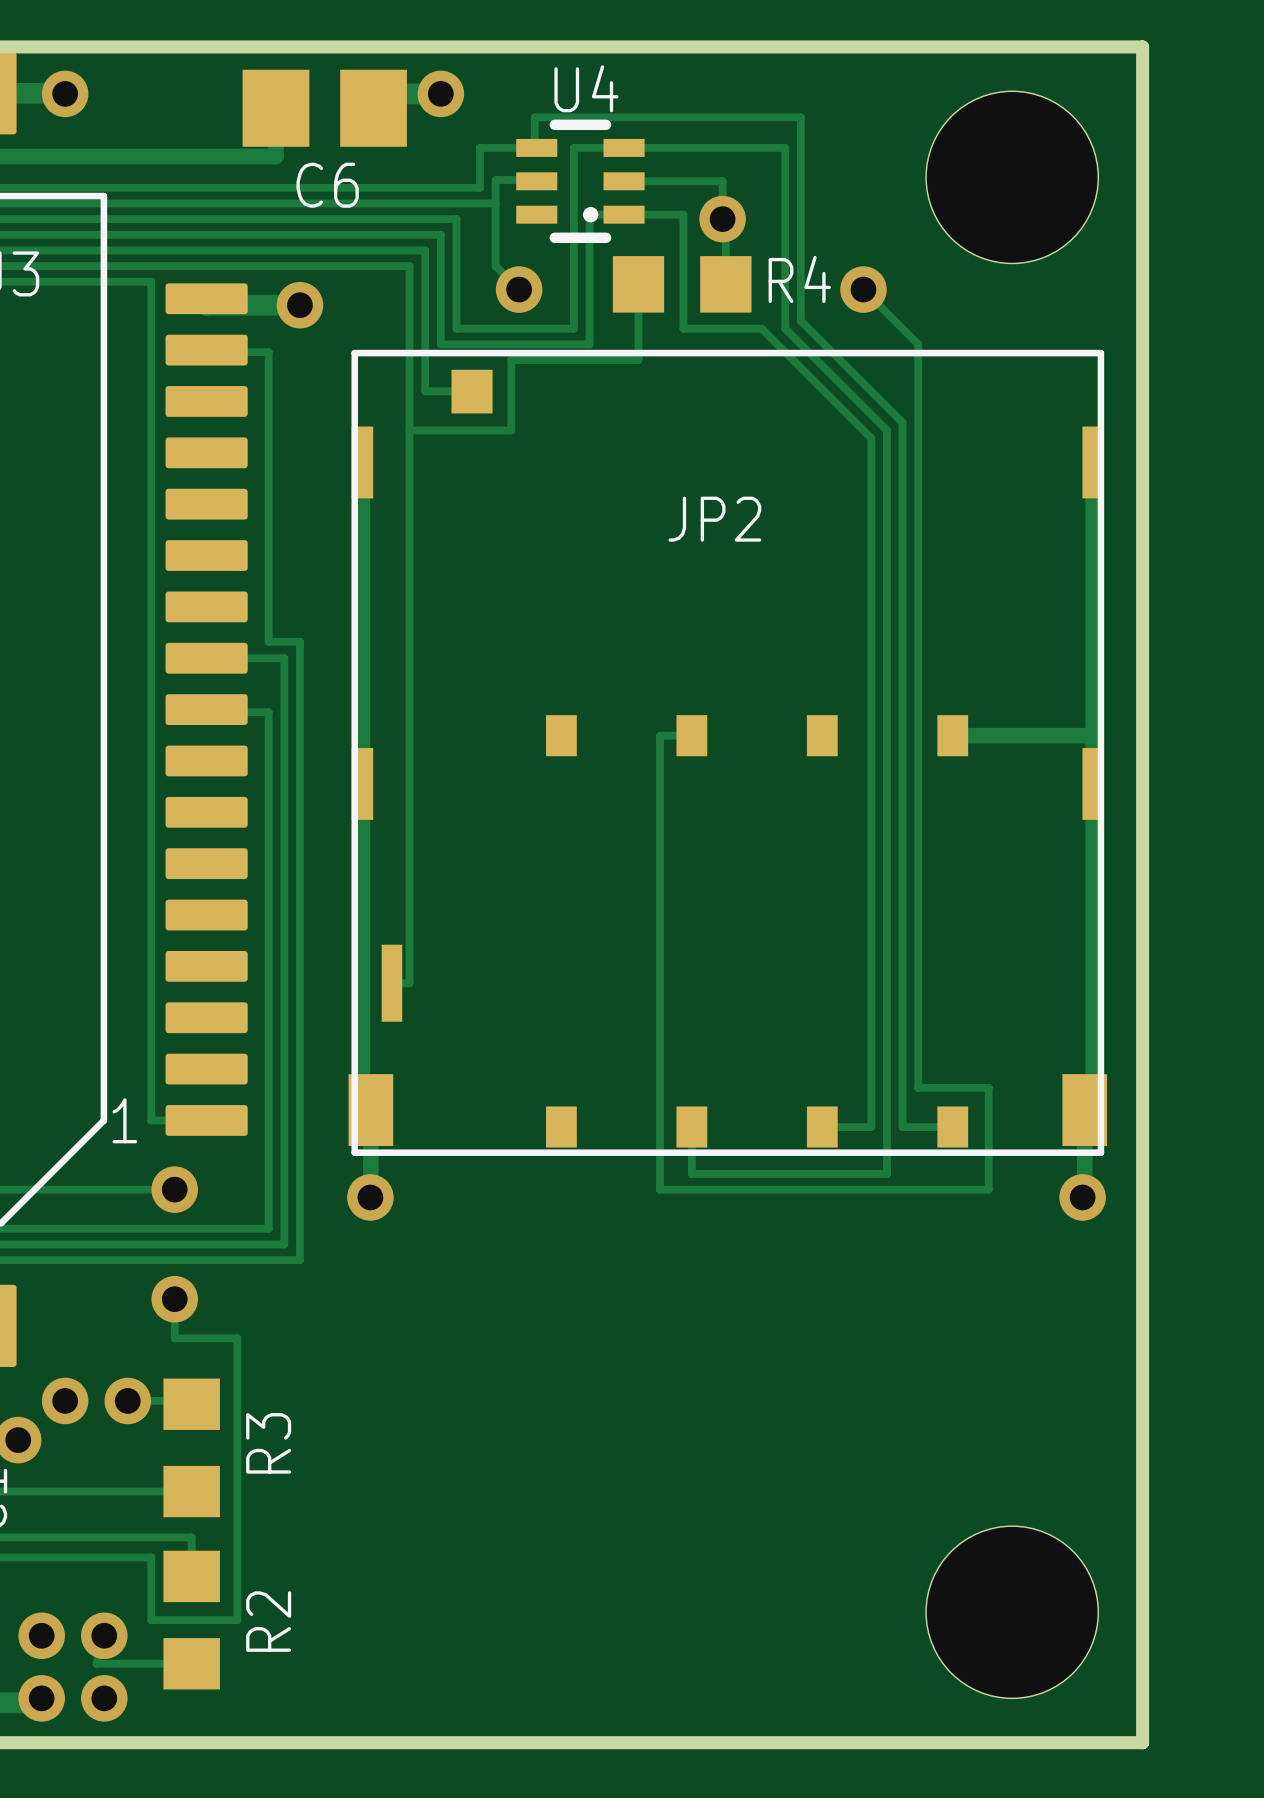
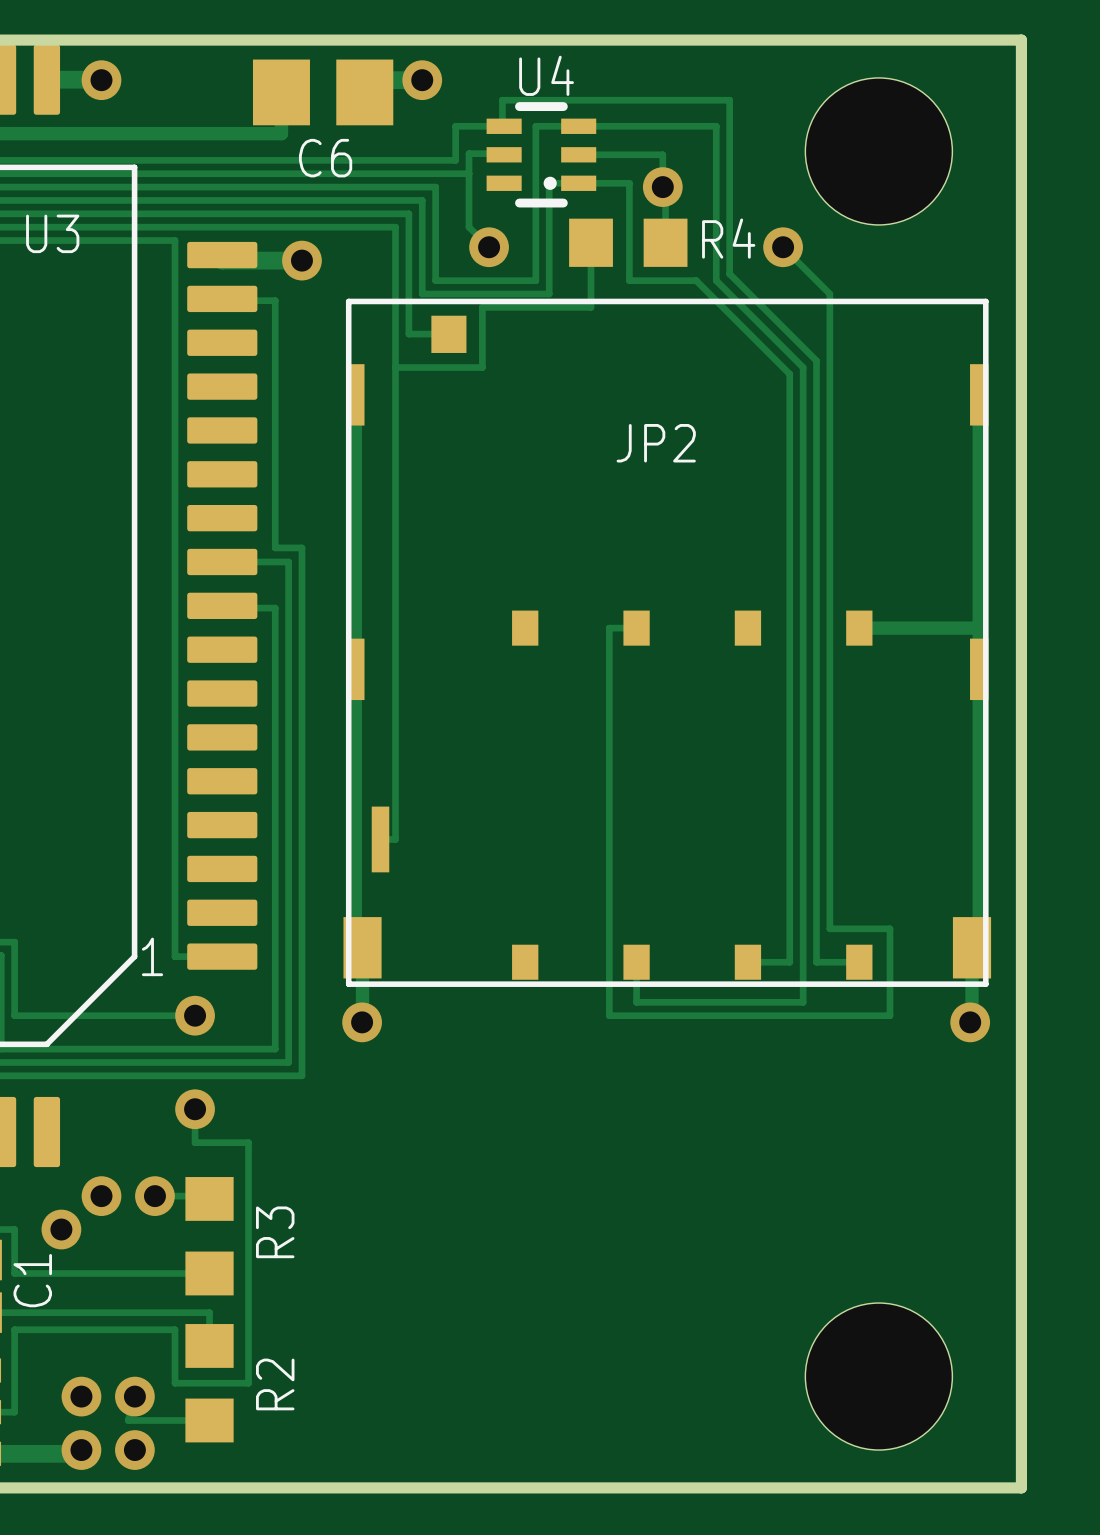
hole position: (1012, 177) -> (878, 151)
hole position: (1012, 1612) -> (878, 1376)

